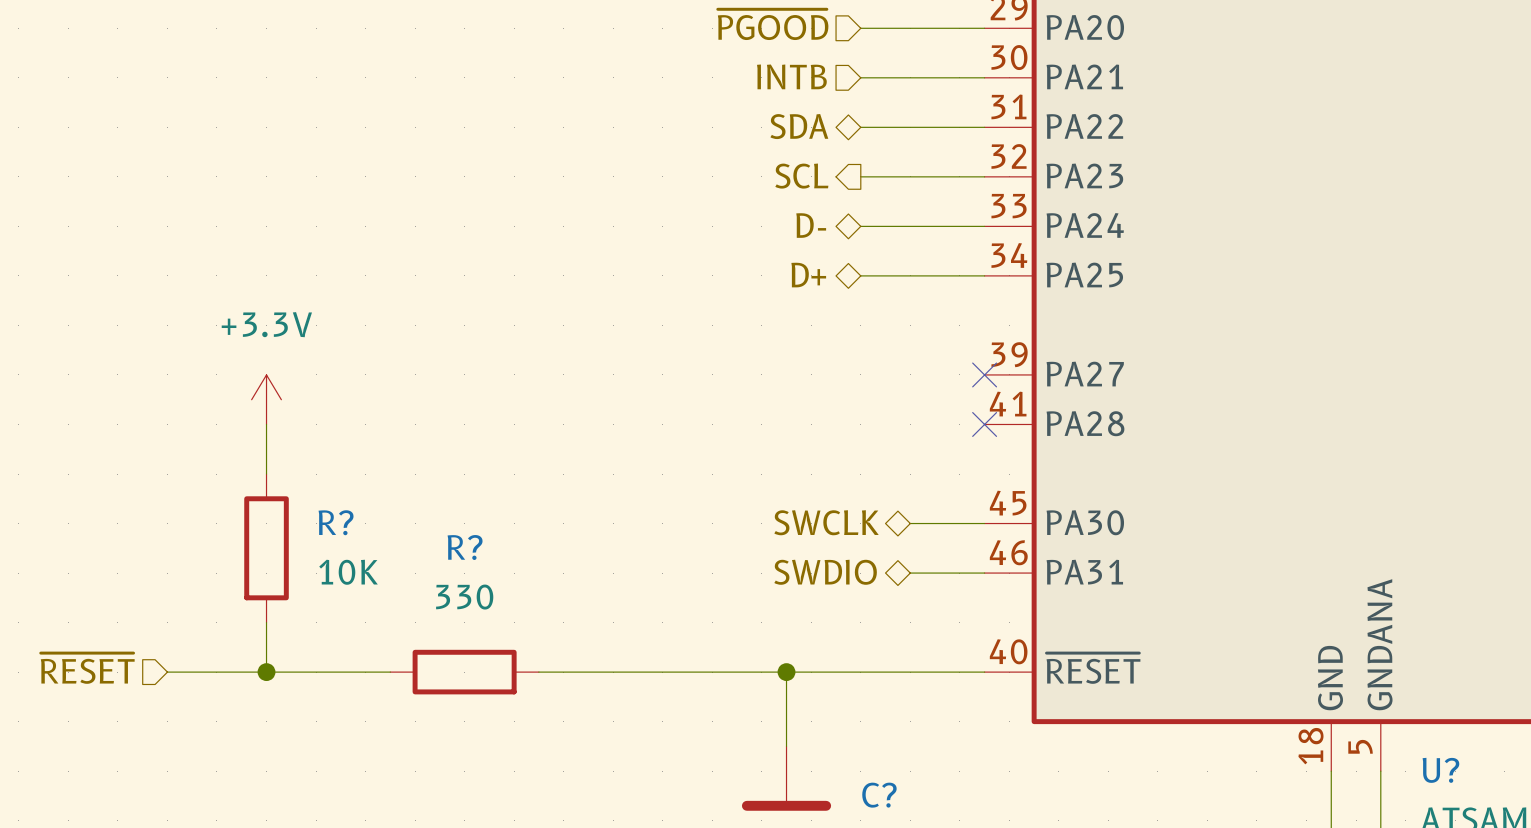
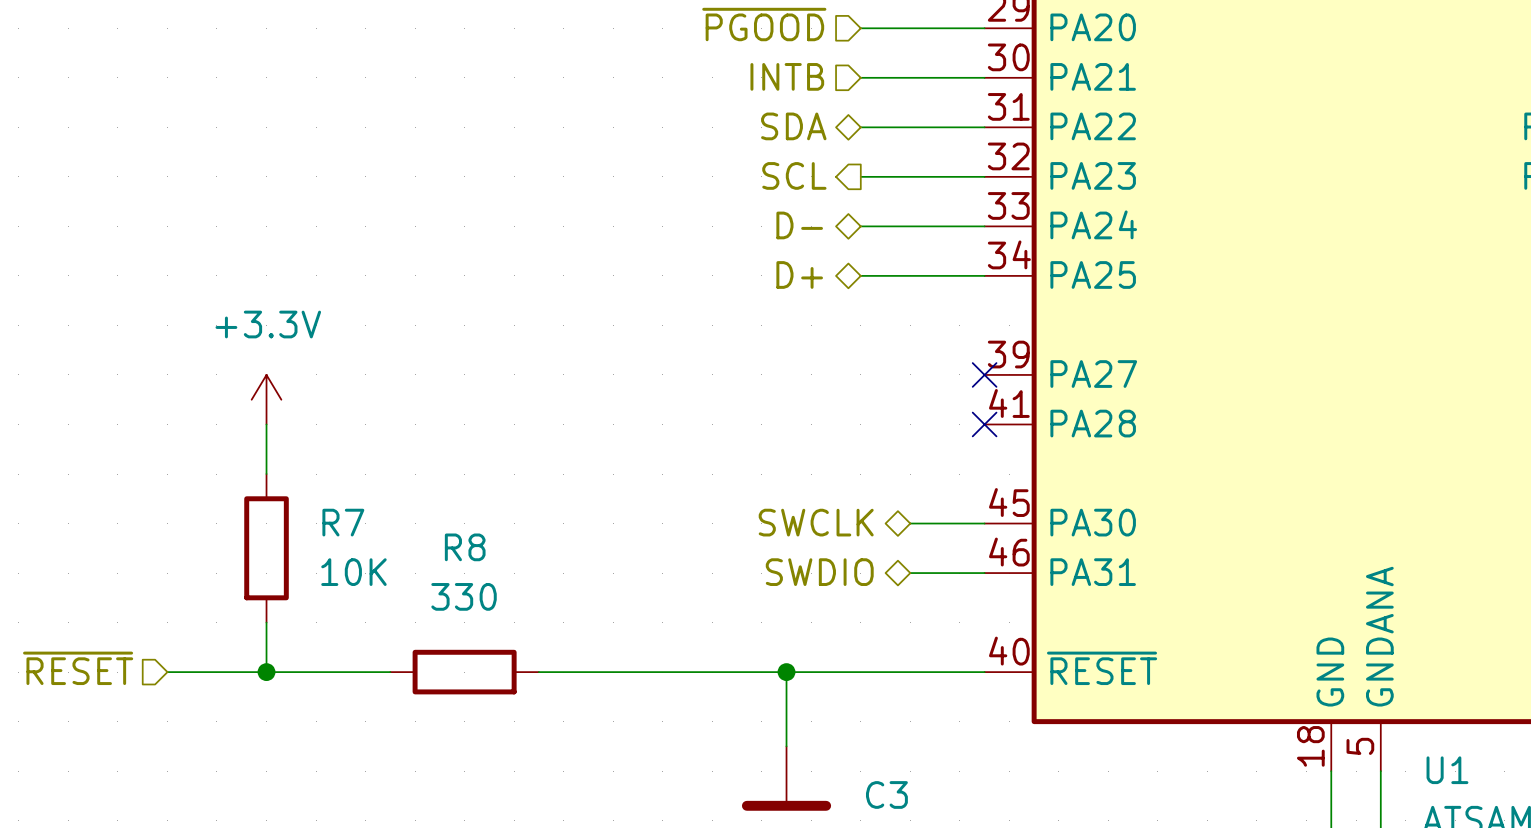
R? name: R? (336, 522) -> R7 (343, 522)
R? name: R? (465, 547) -> R8 (465, 547)
U? name: U? (1440, 770) -> U1 (1447, 770)
C? name: C? (879, 795) -> C3 (886, 794)

